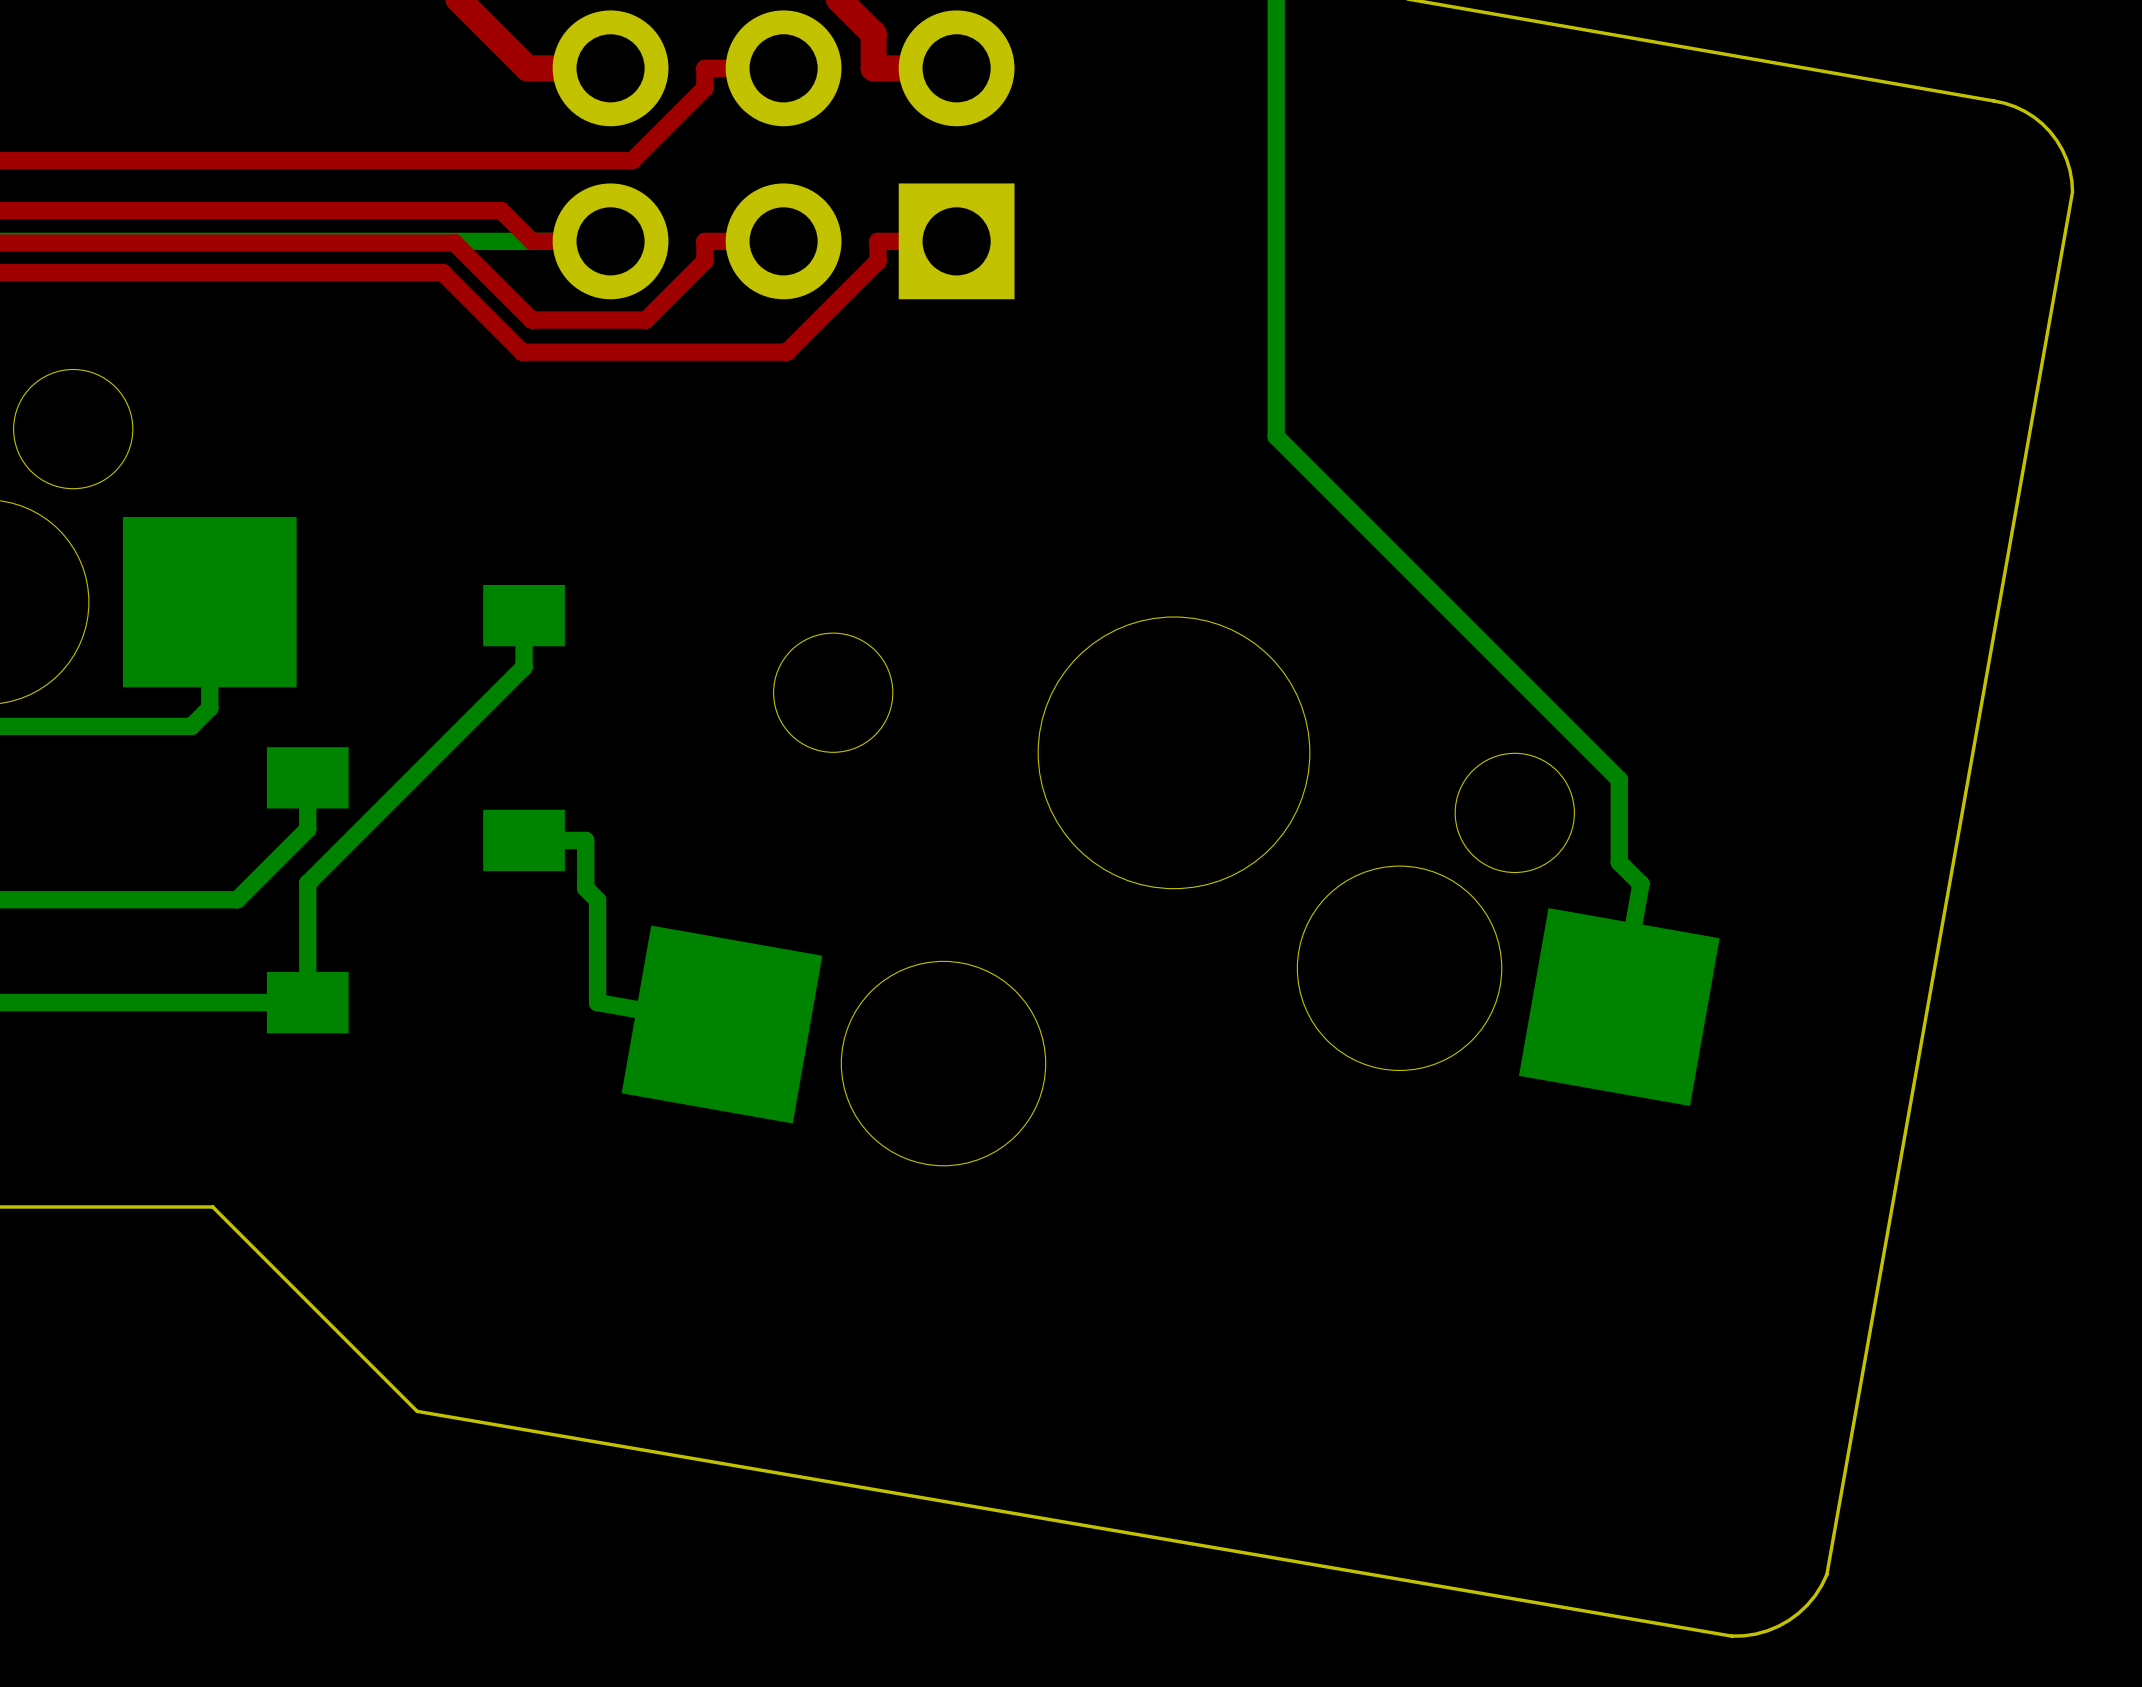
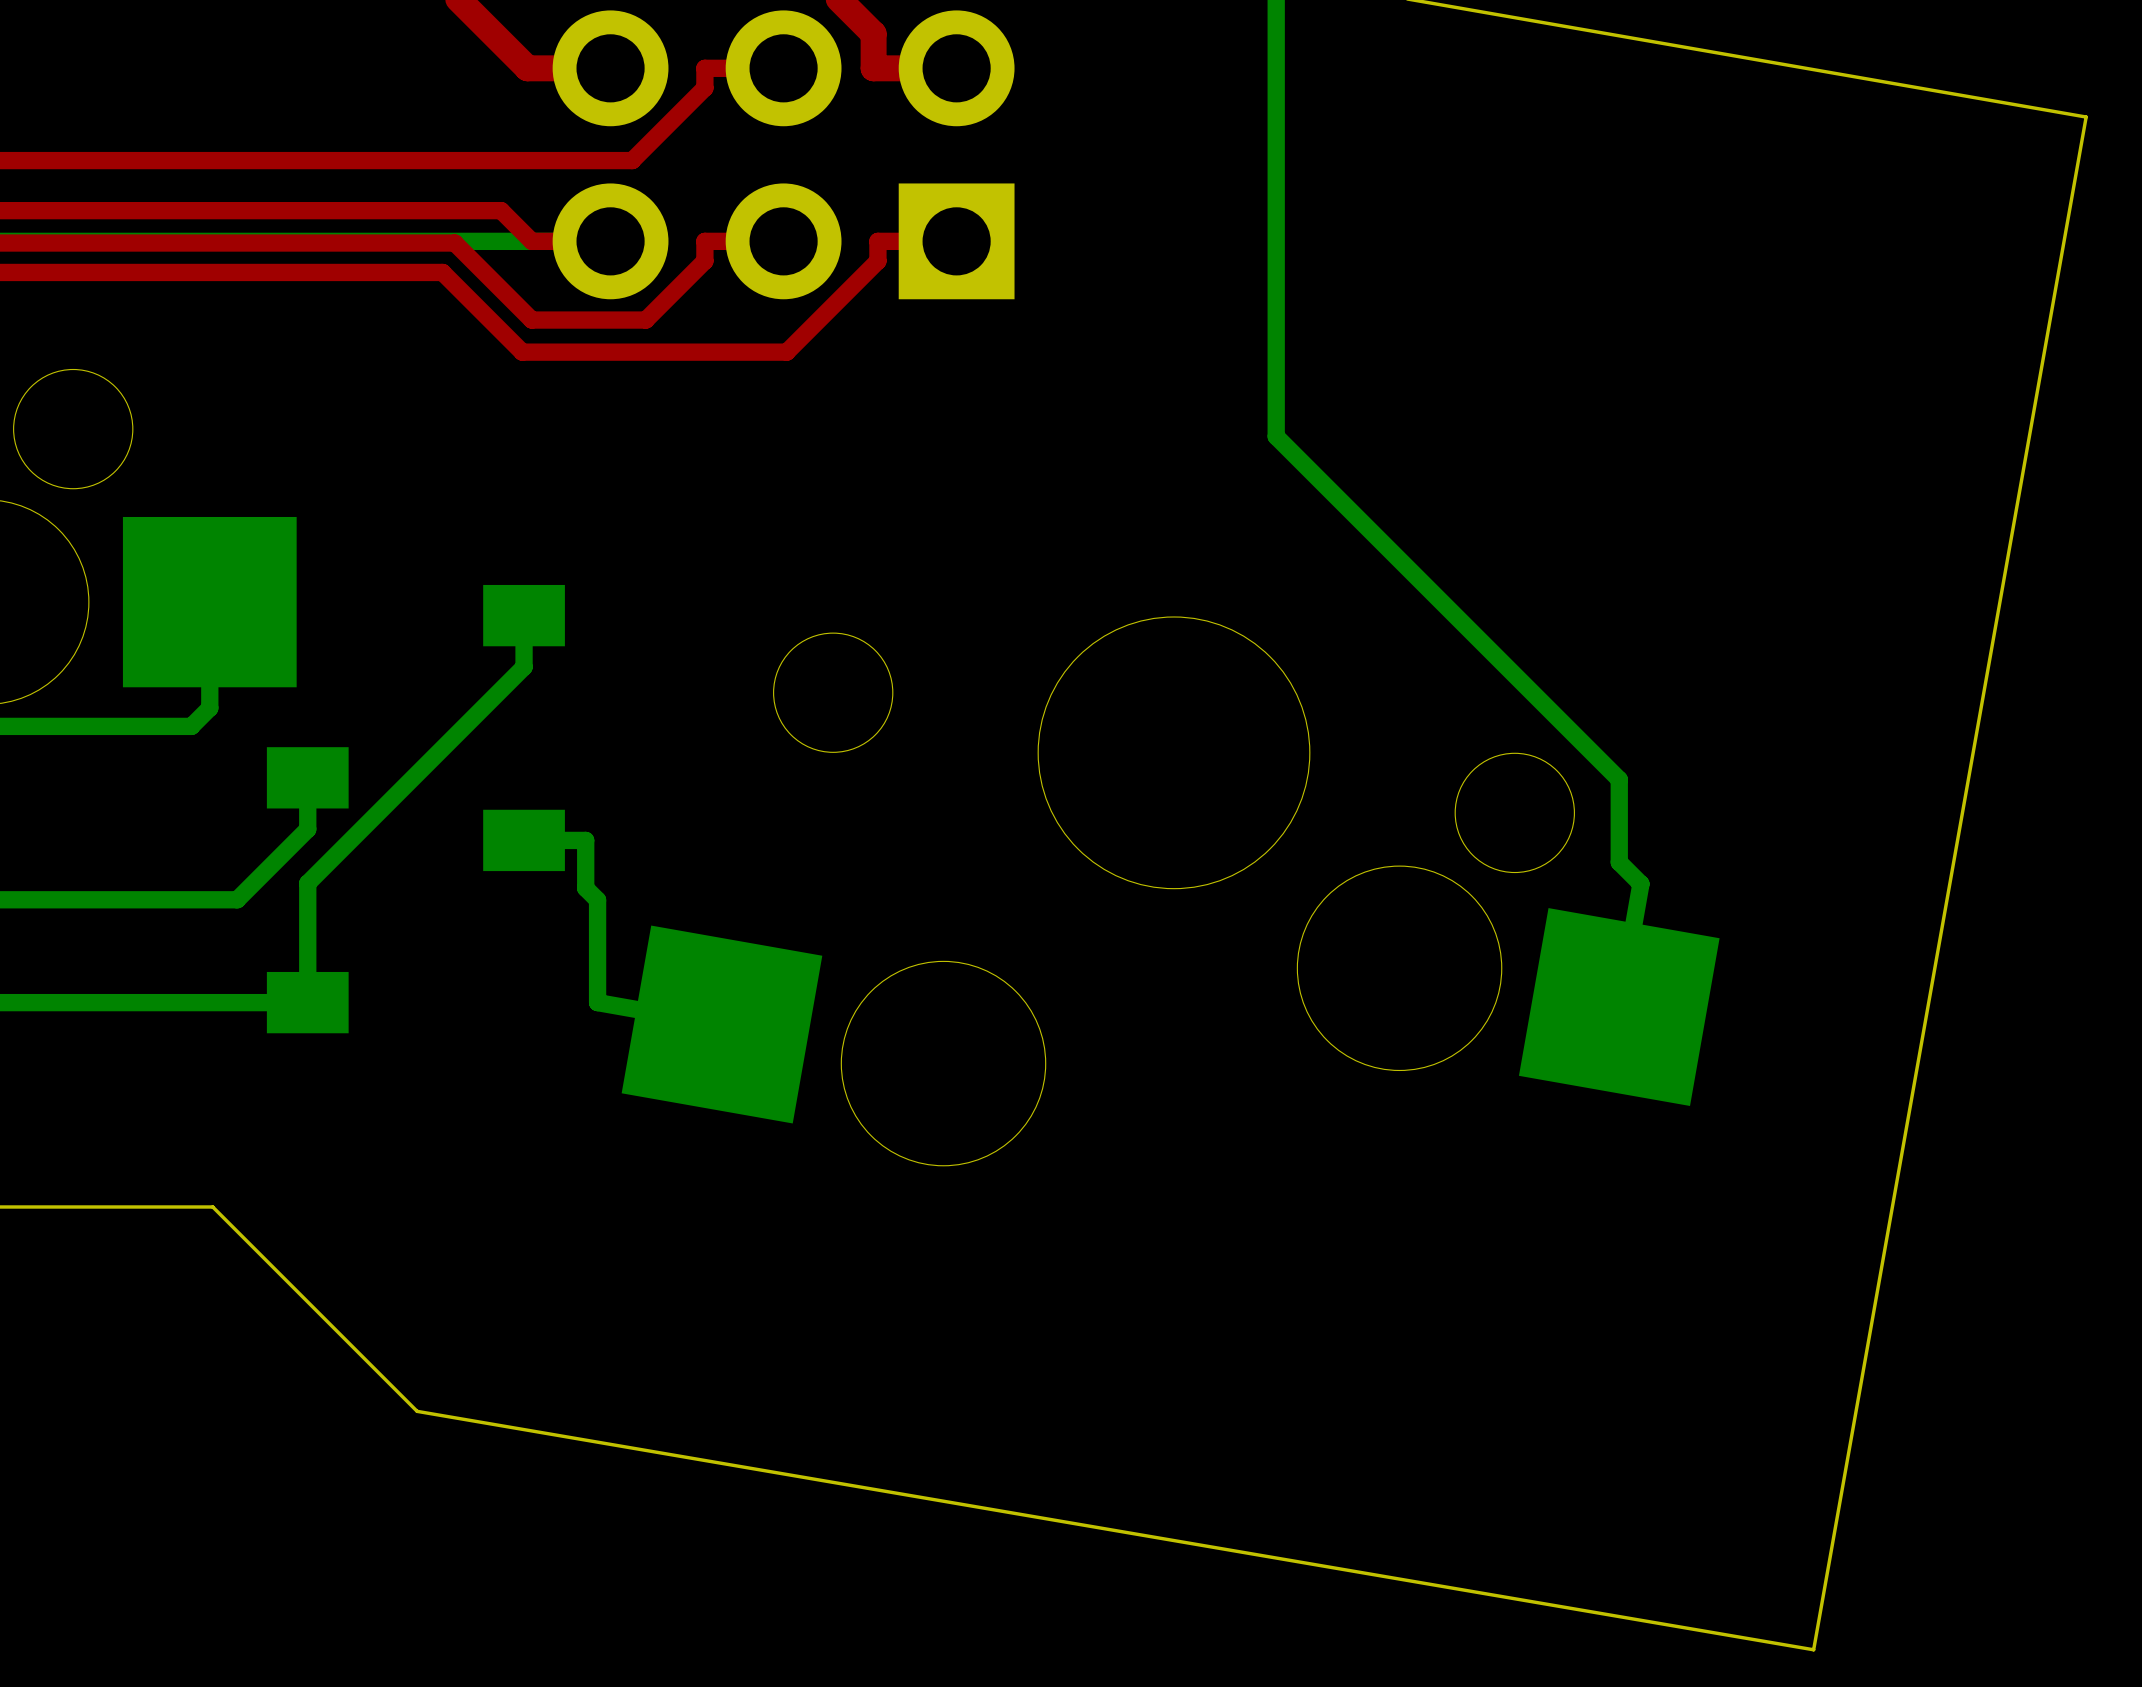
board edge: (1994, 101) (2024, 111) (2050, 131) (2066, 159) (2072, 191) (1826, 1574) (1815, 1595) (1798, 1613) (1767, 1630) (1731, 1636) (417, 1411) -> (1994, 101) (2086, 117) (1813, 1649) (417, 1411)

